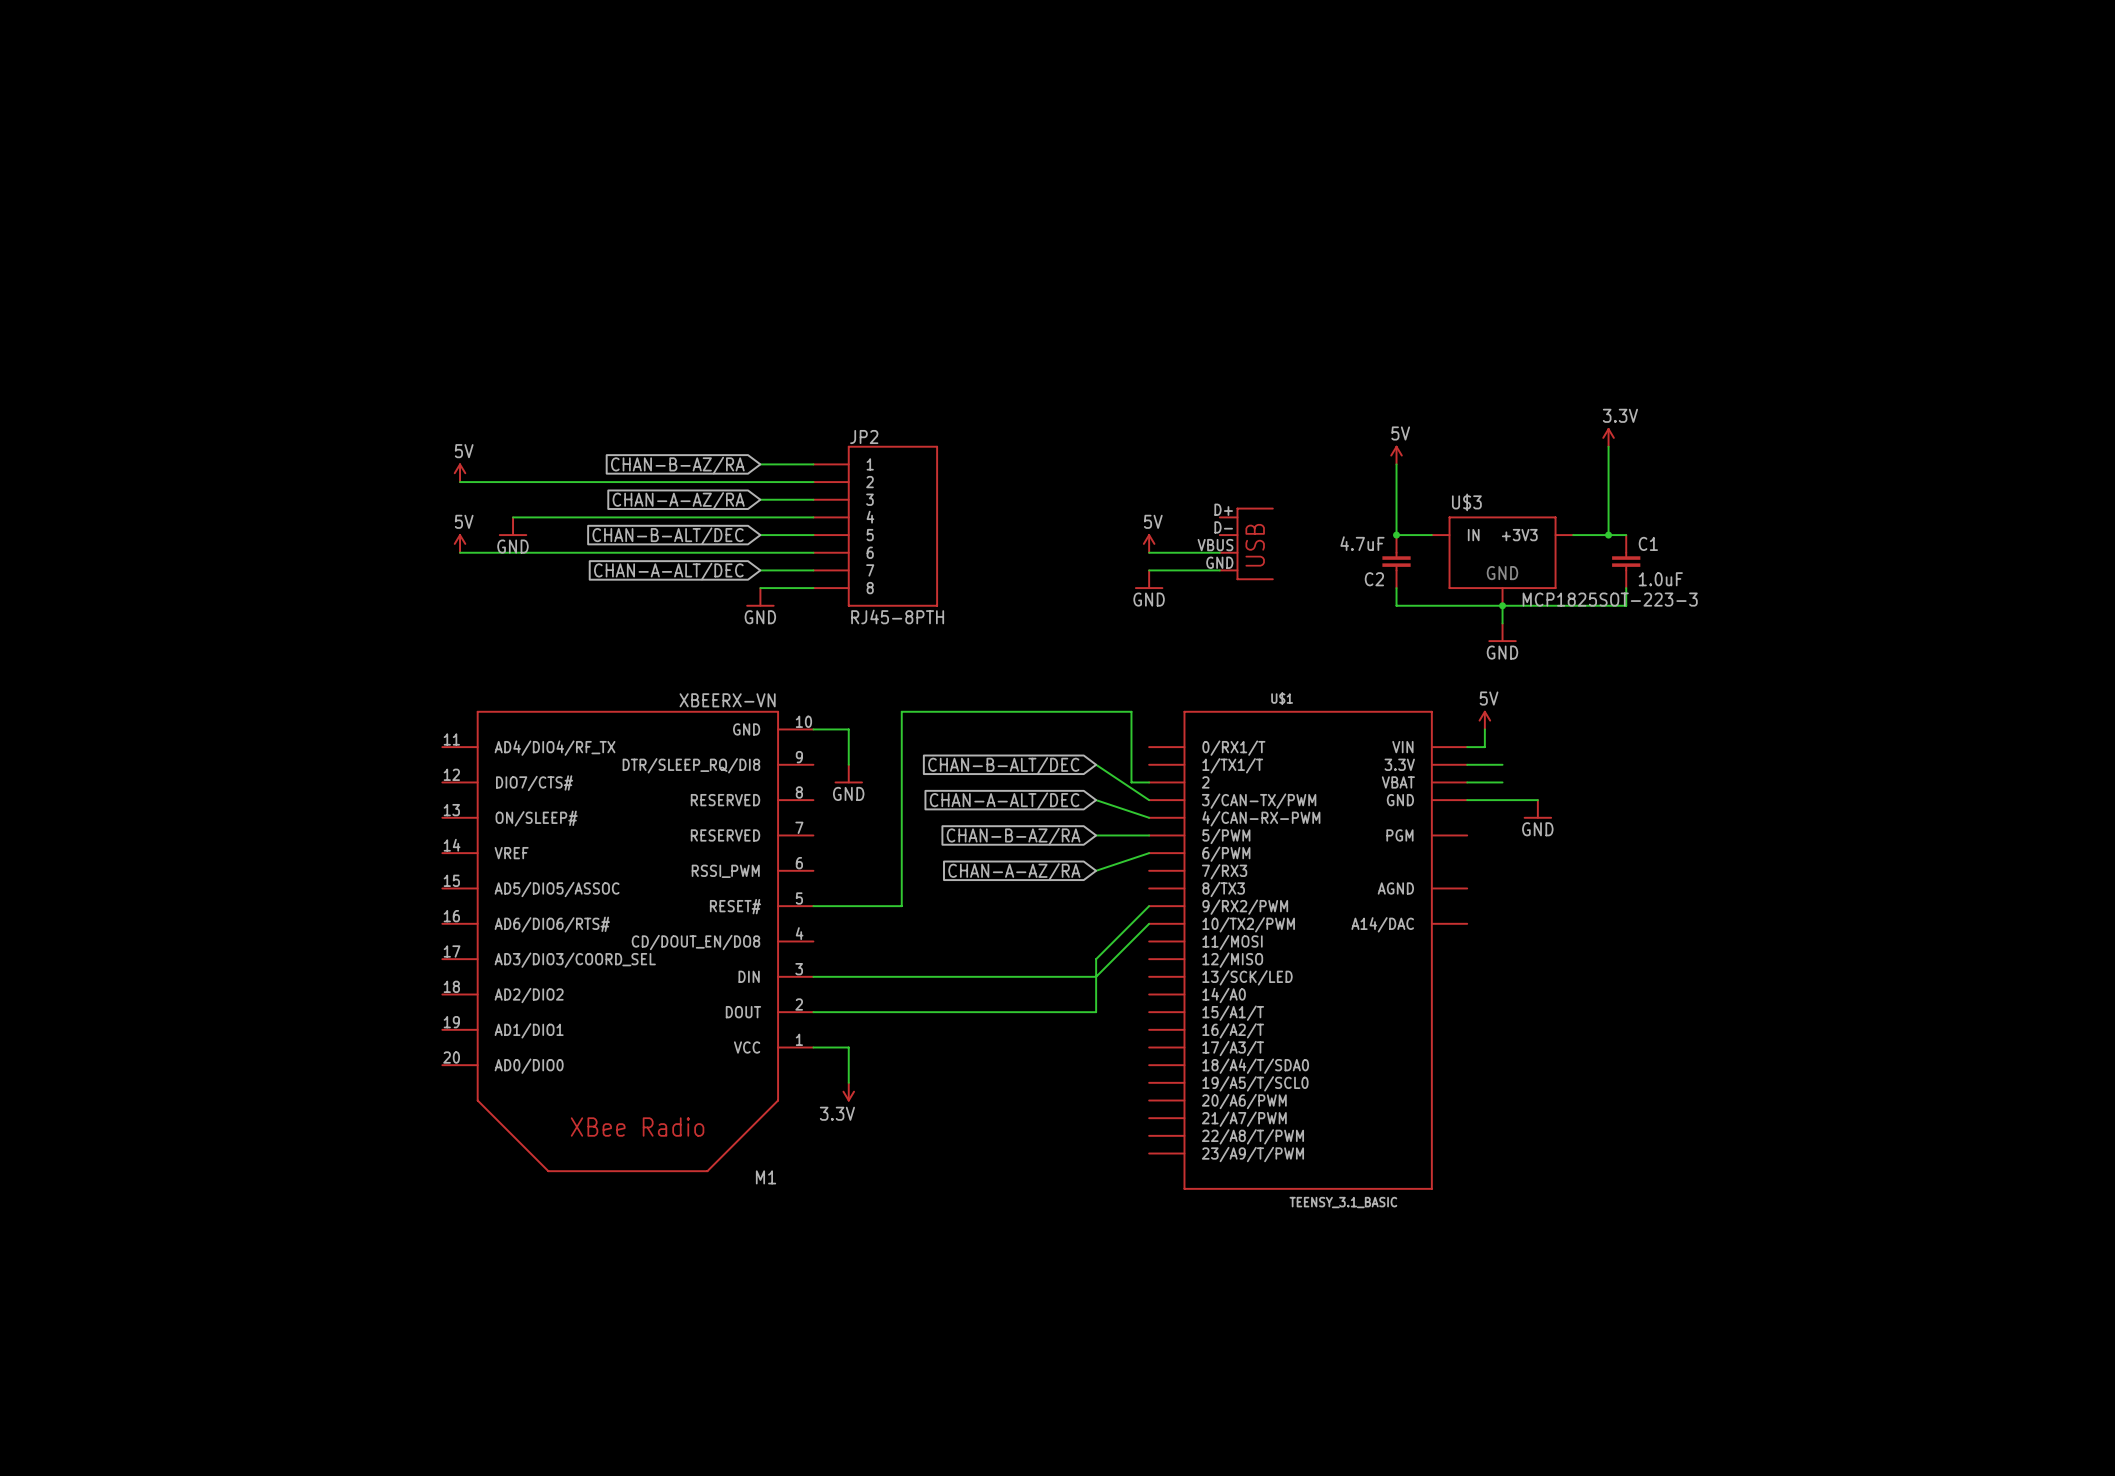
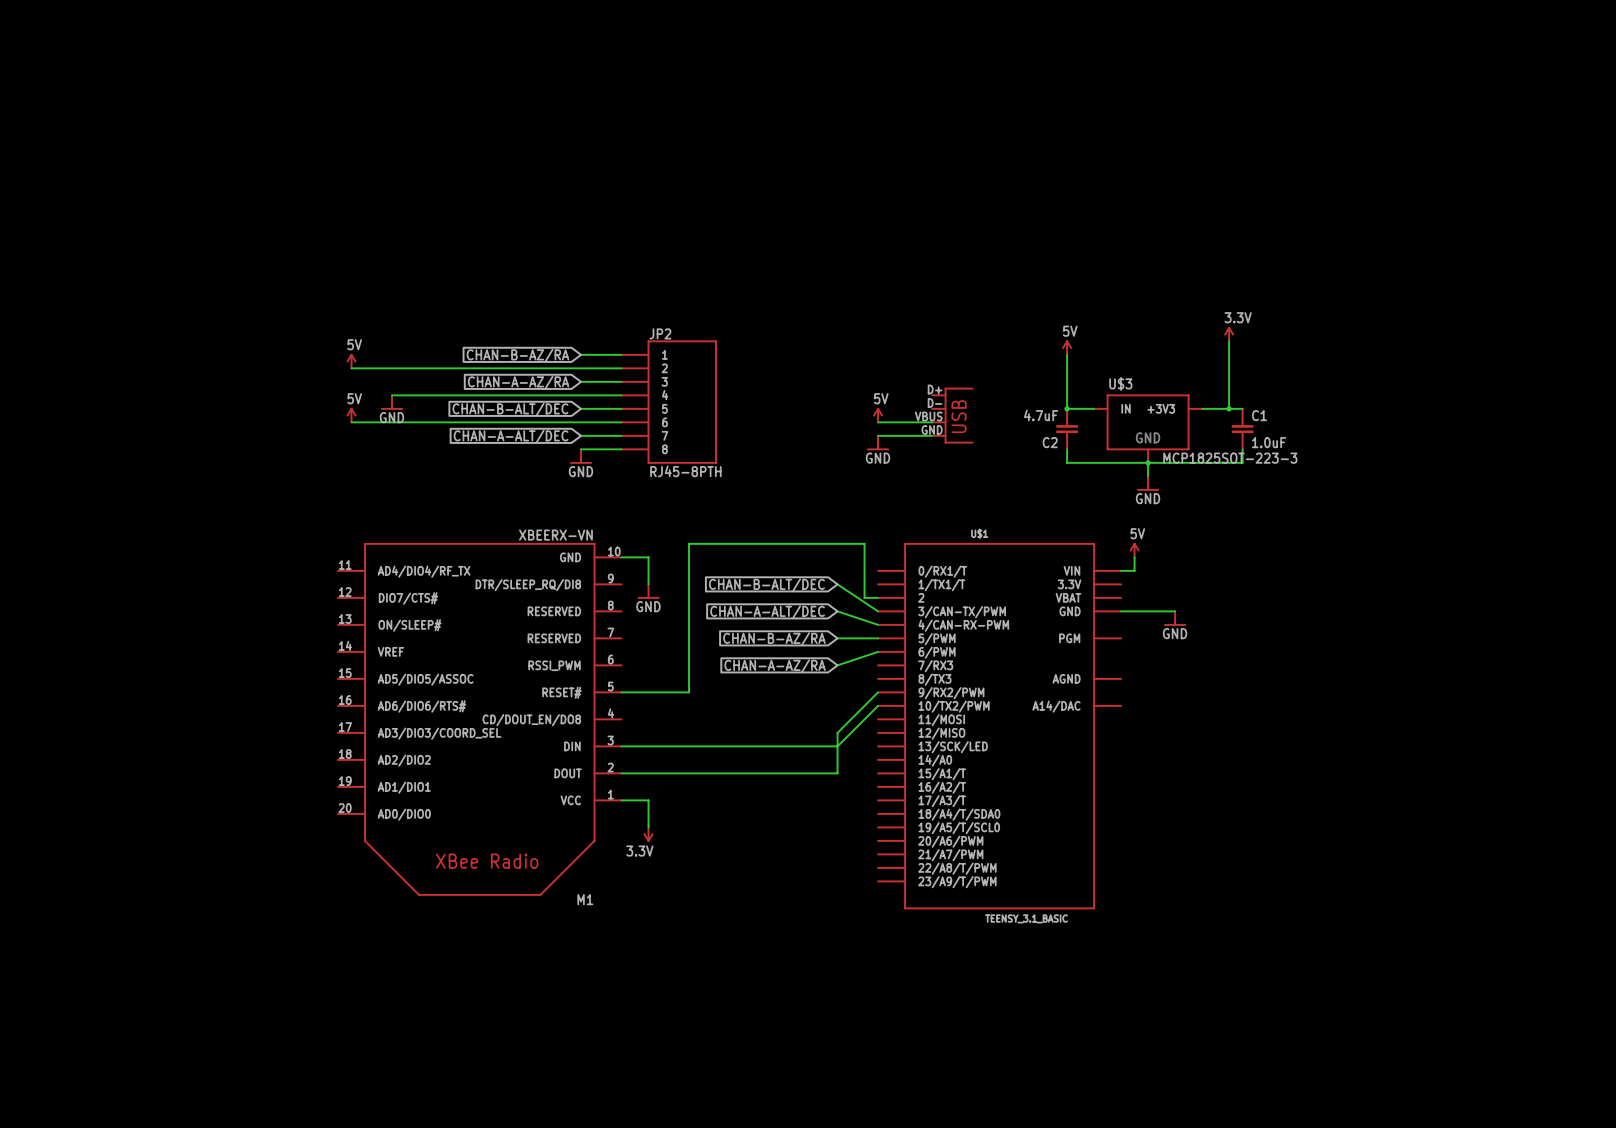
wire: (1467, 764) (1502, 764) -> none
wire: (1467, 782) (1502, 782) -> none

